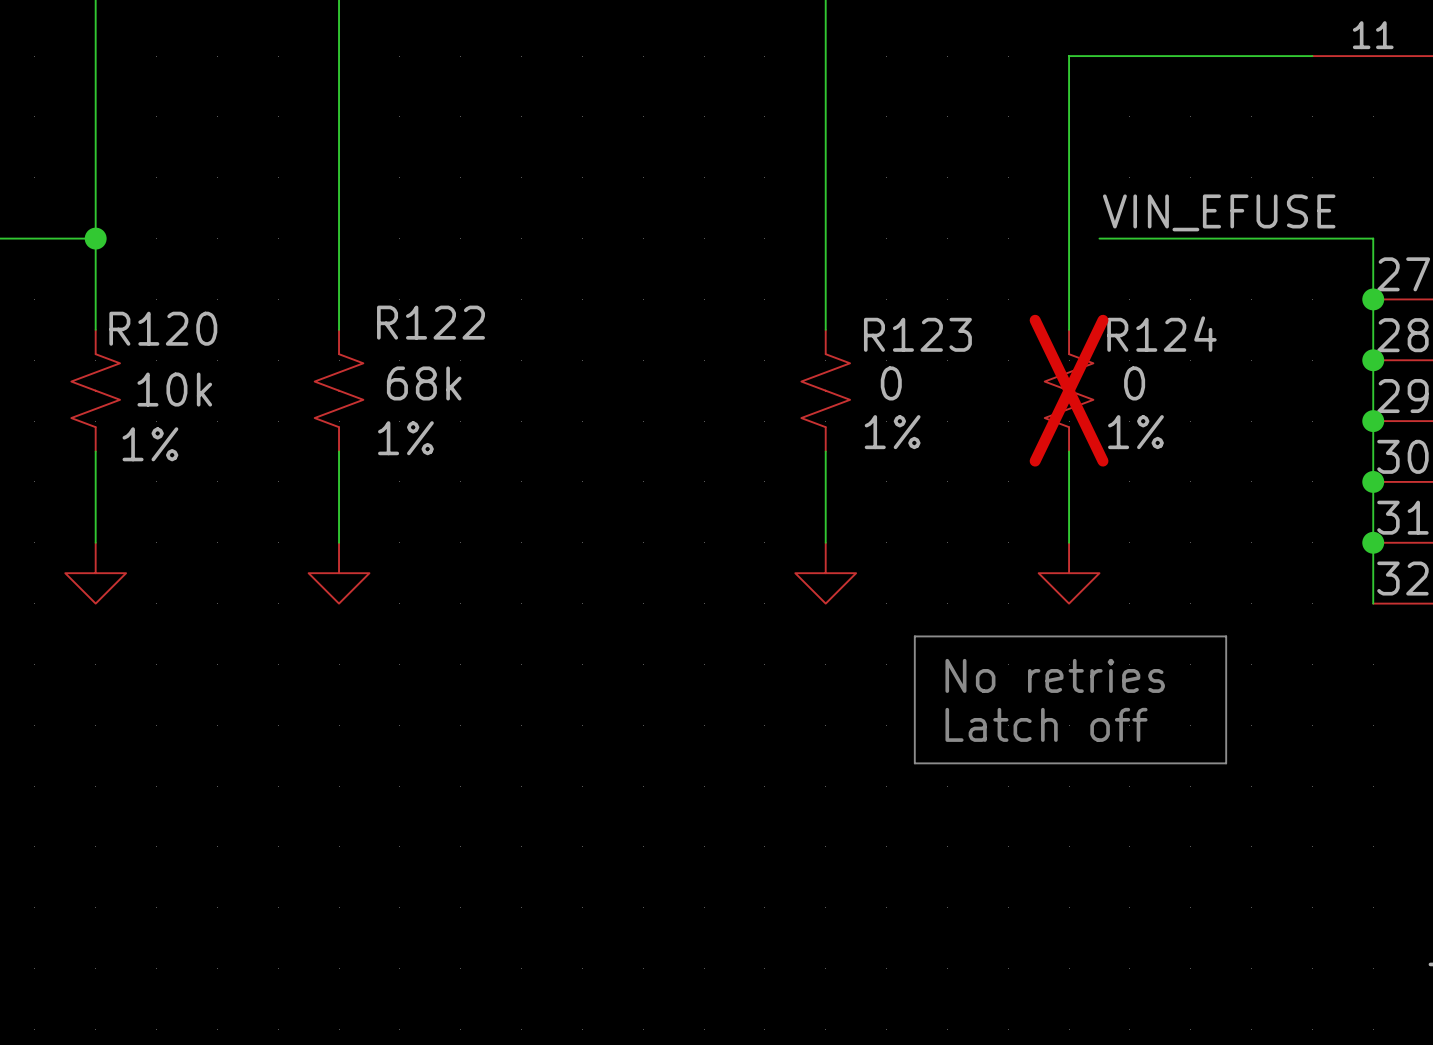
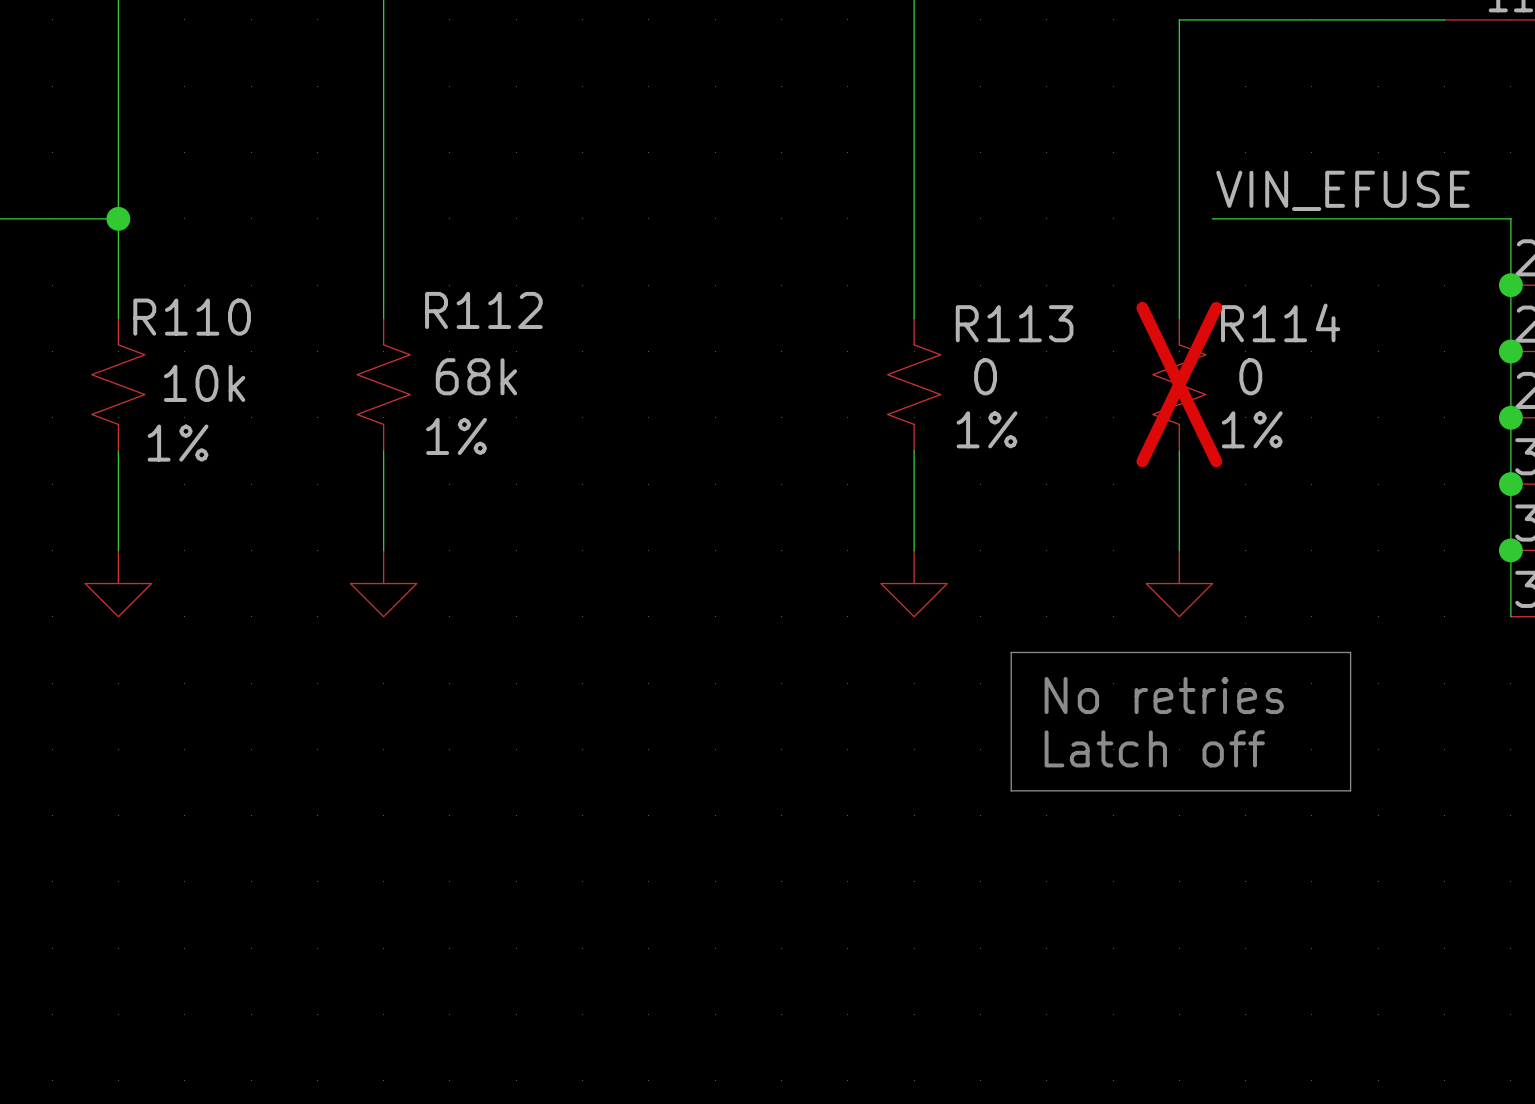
R122 name: R122 (431, 322) -> R112 (483, 310)
R120 name: R120 (163, 328) -> R110 (192, 317)
R123 name: R123 (917, 334) -> R113 (1014, 323)
R124 name: R124 (1161, 334) -> R114 (1280, 322)

